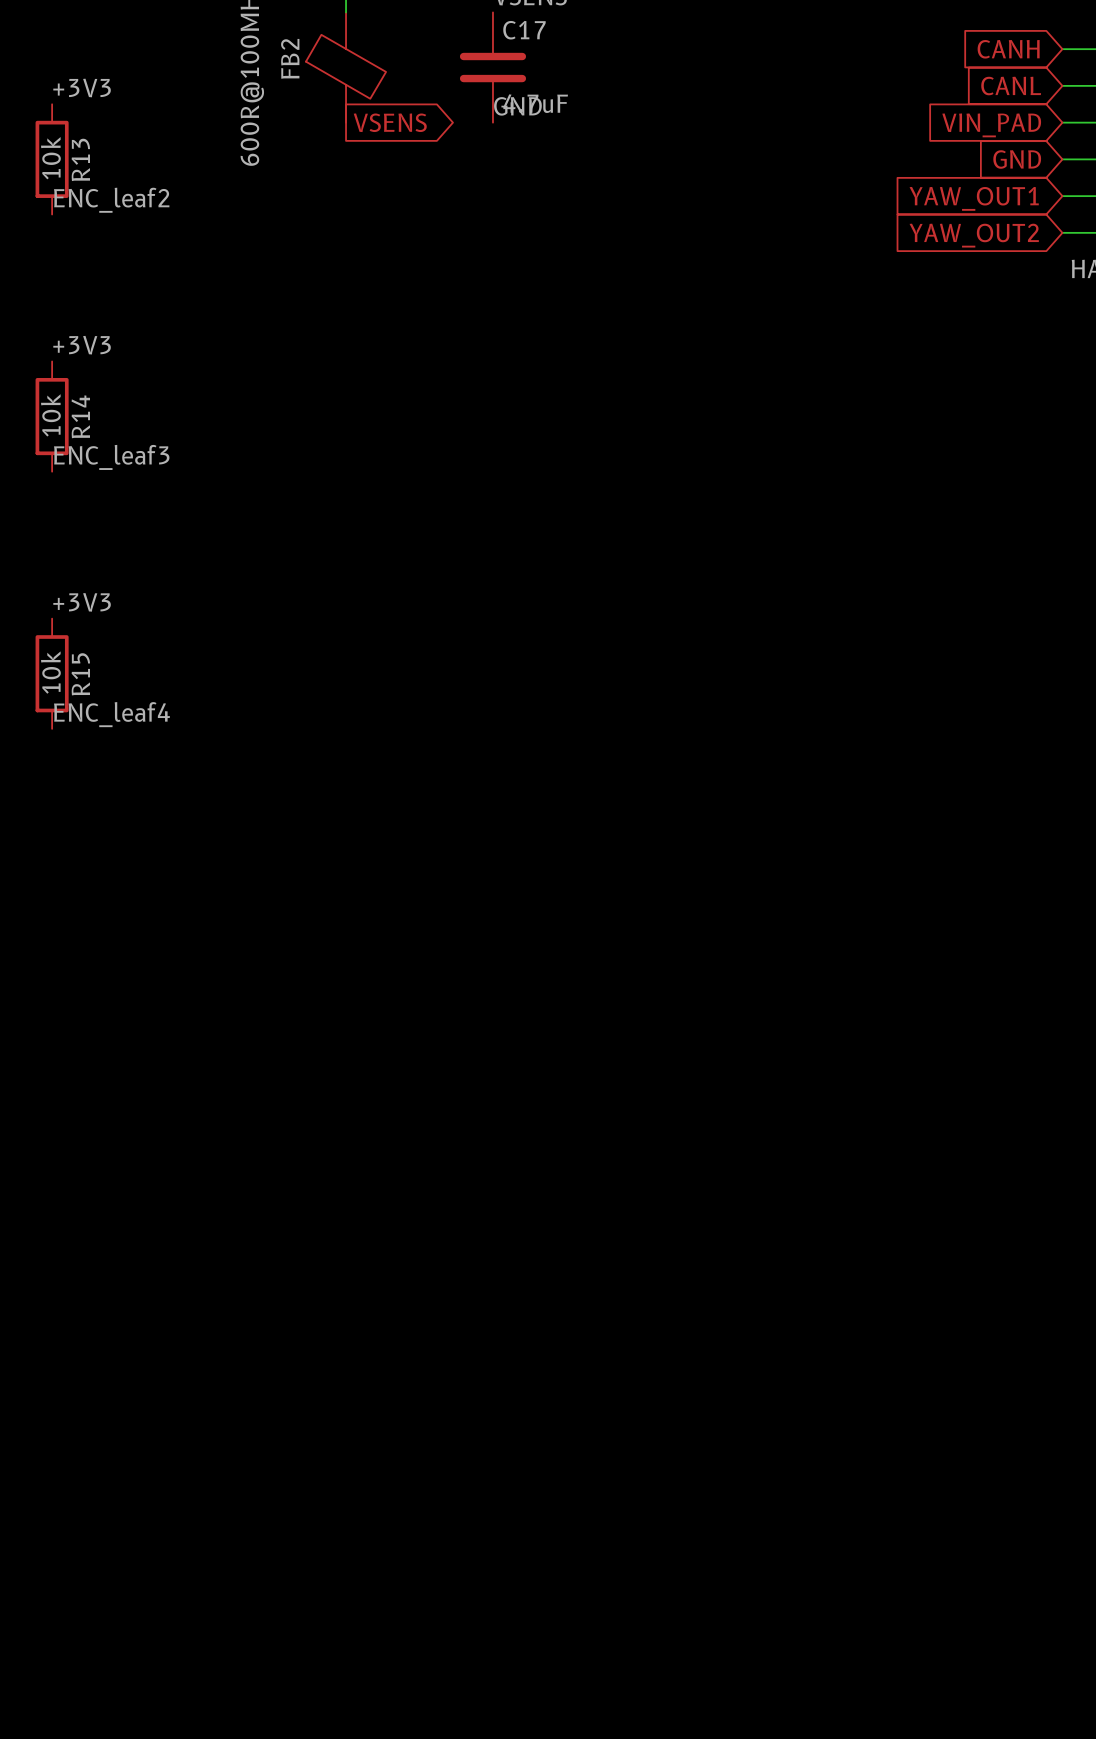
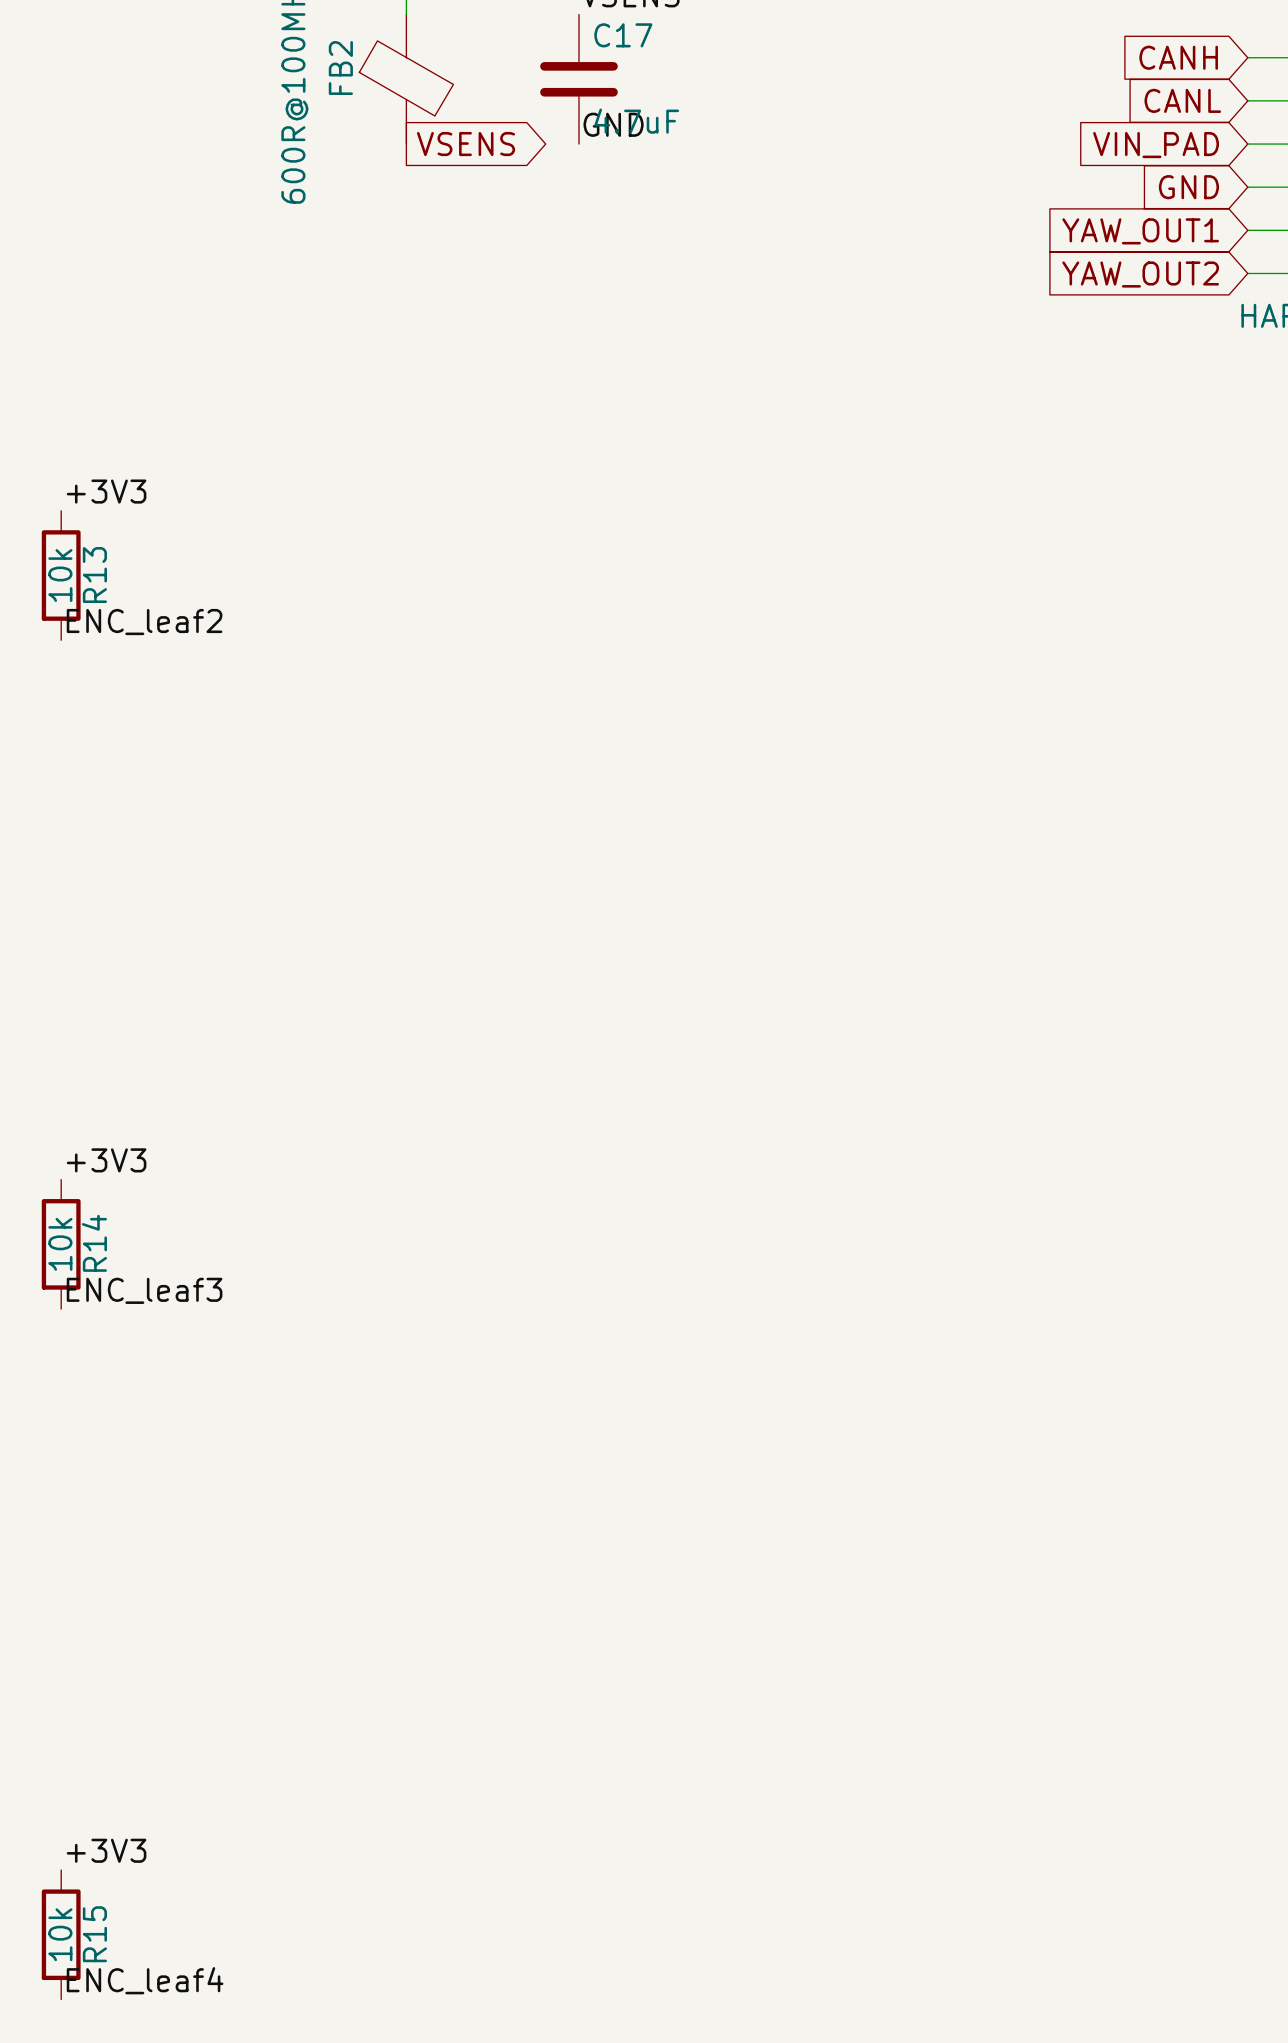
label: +3V3 (82, 88) -> none
R13 position: (52, 159) -> (61, 575)
label position: ENC_leaf2 (111, 200) -> ENC_leaf2 (144, 622)
label position: +3V3 (82, 345) -> +3V3 (106, 491)
R14 position: (52, 416) -> (61, 1244)
label: ENC_leaf3 (111, 457) -> none
label: +3V3 (82, 602) -> none
R15 position: (52, 673) -> (61, 1934)
label: ENC_leaf4 (111, 714) -> none
label: none -> +3V3 (106, 1160)
label: none -> ENC_leaf3 (144, 1290)
label: none -> +3V3 (106, 1850)
label: none -> ENC_leaf4 (145, 1980)

